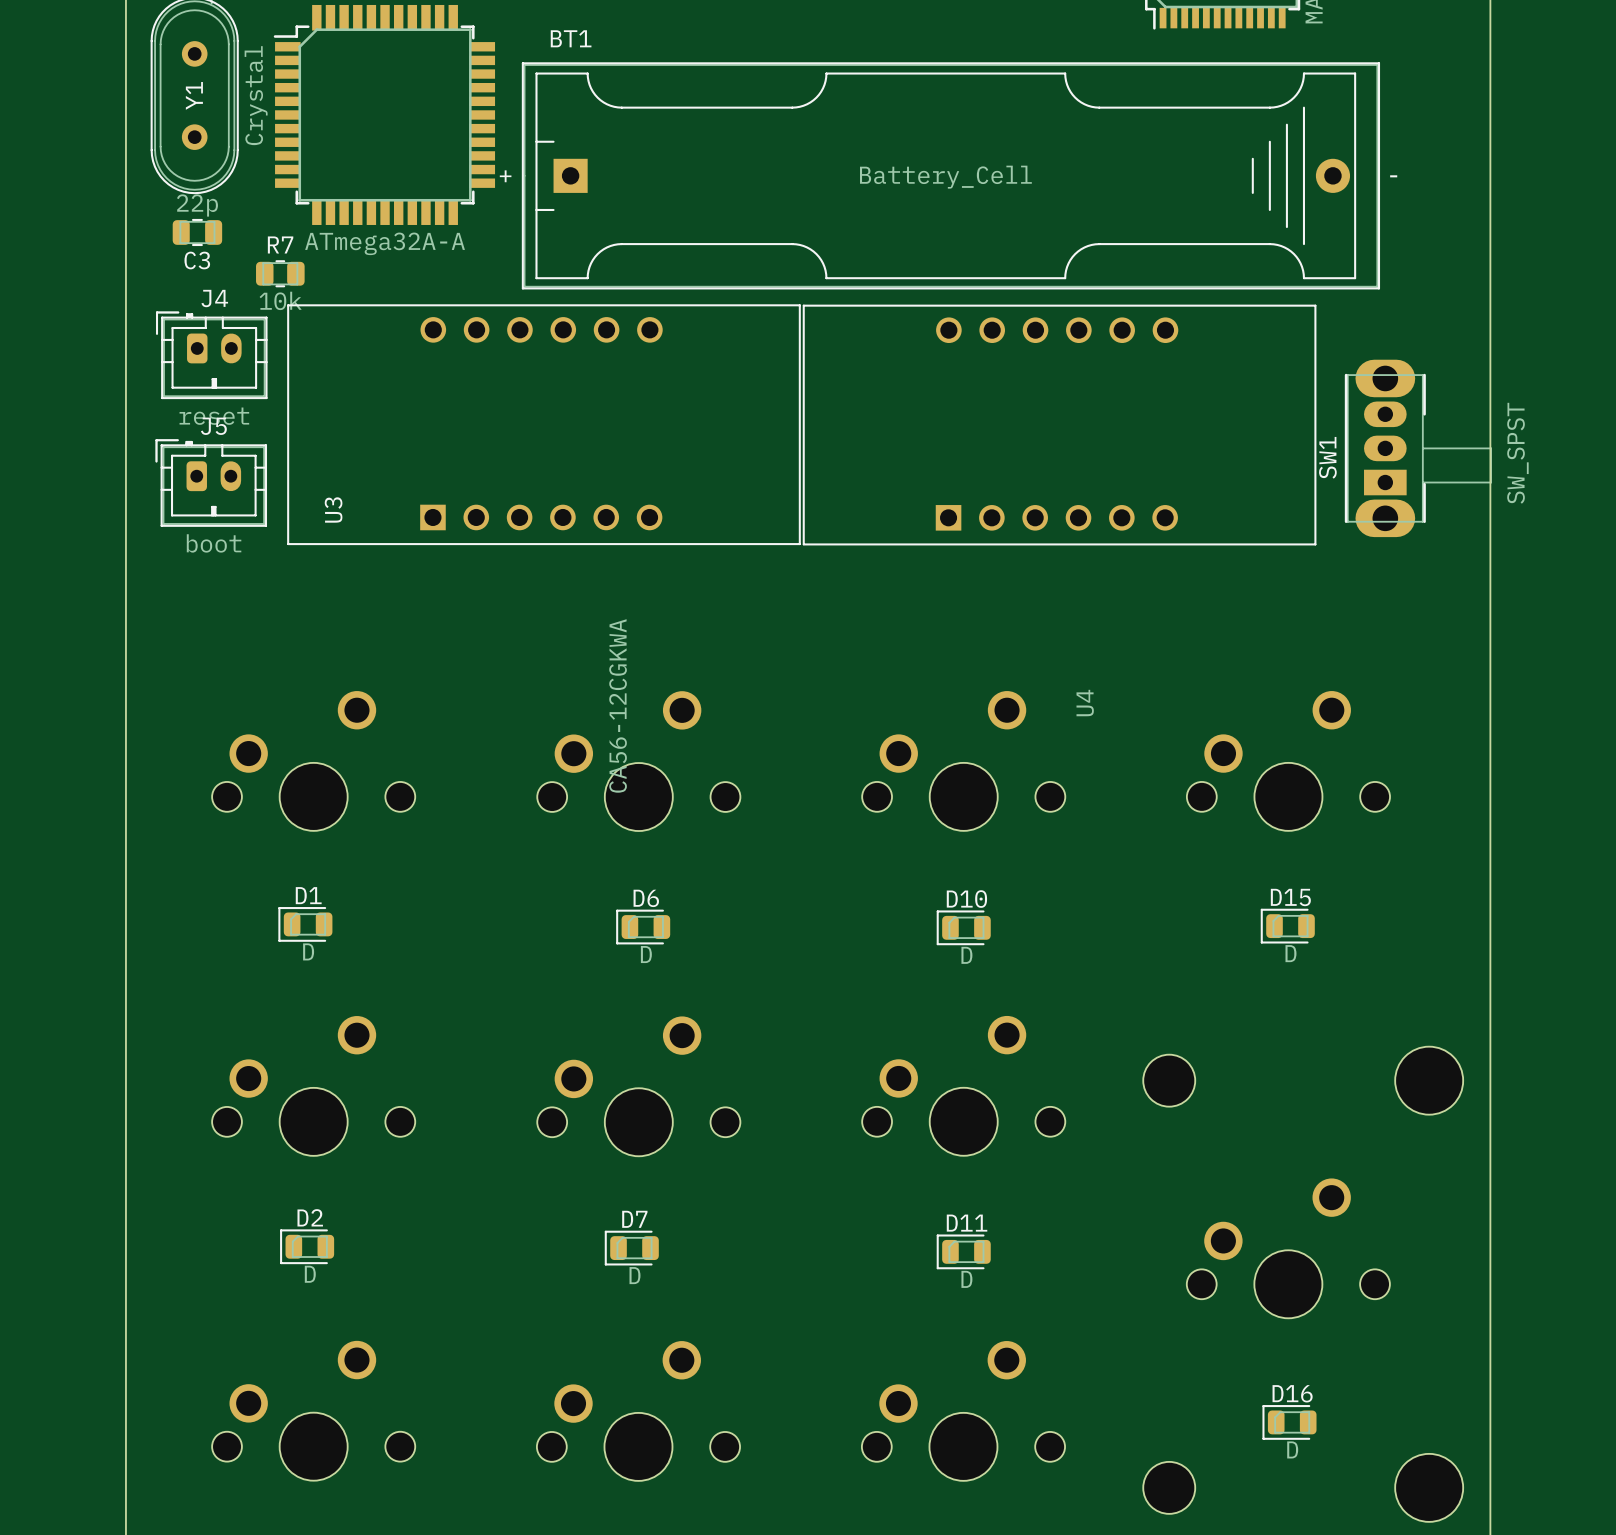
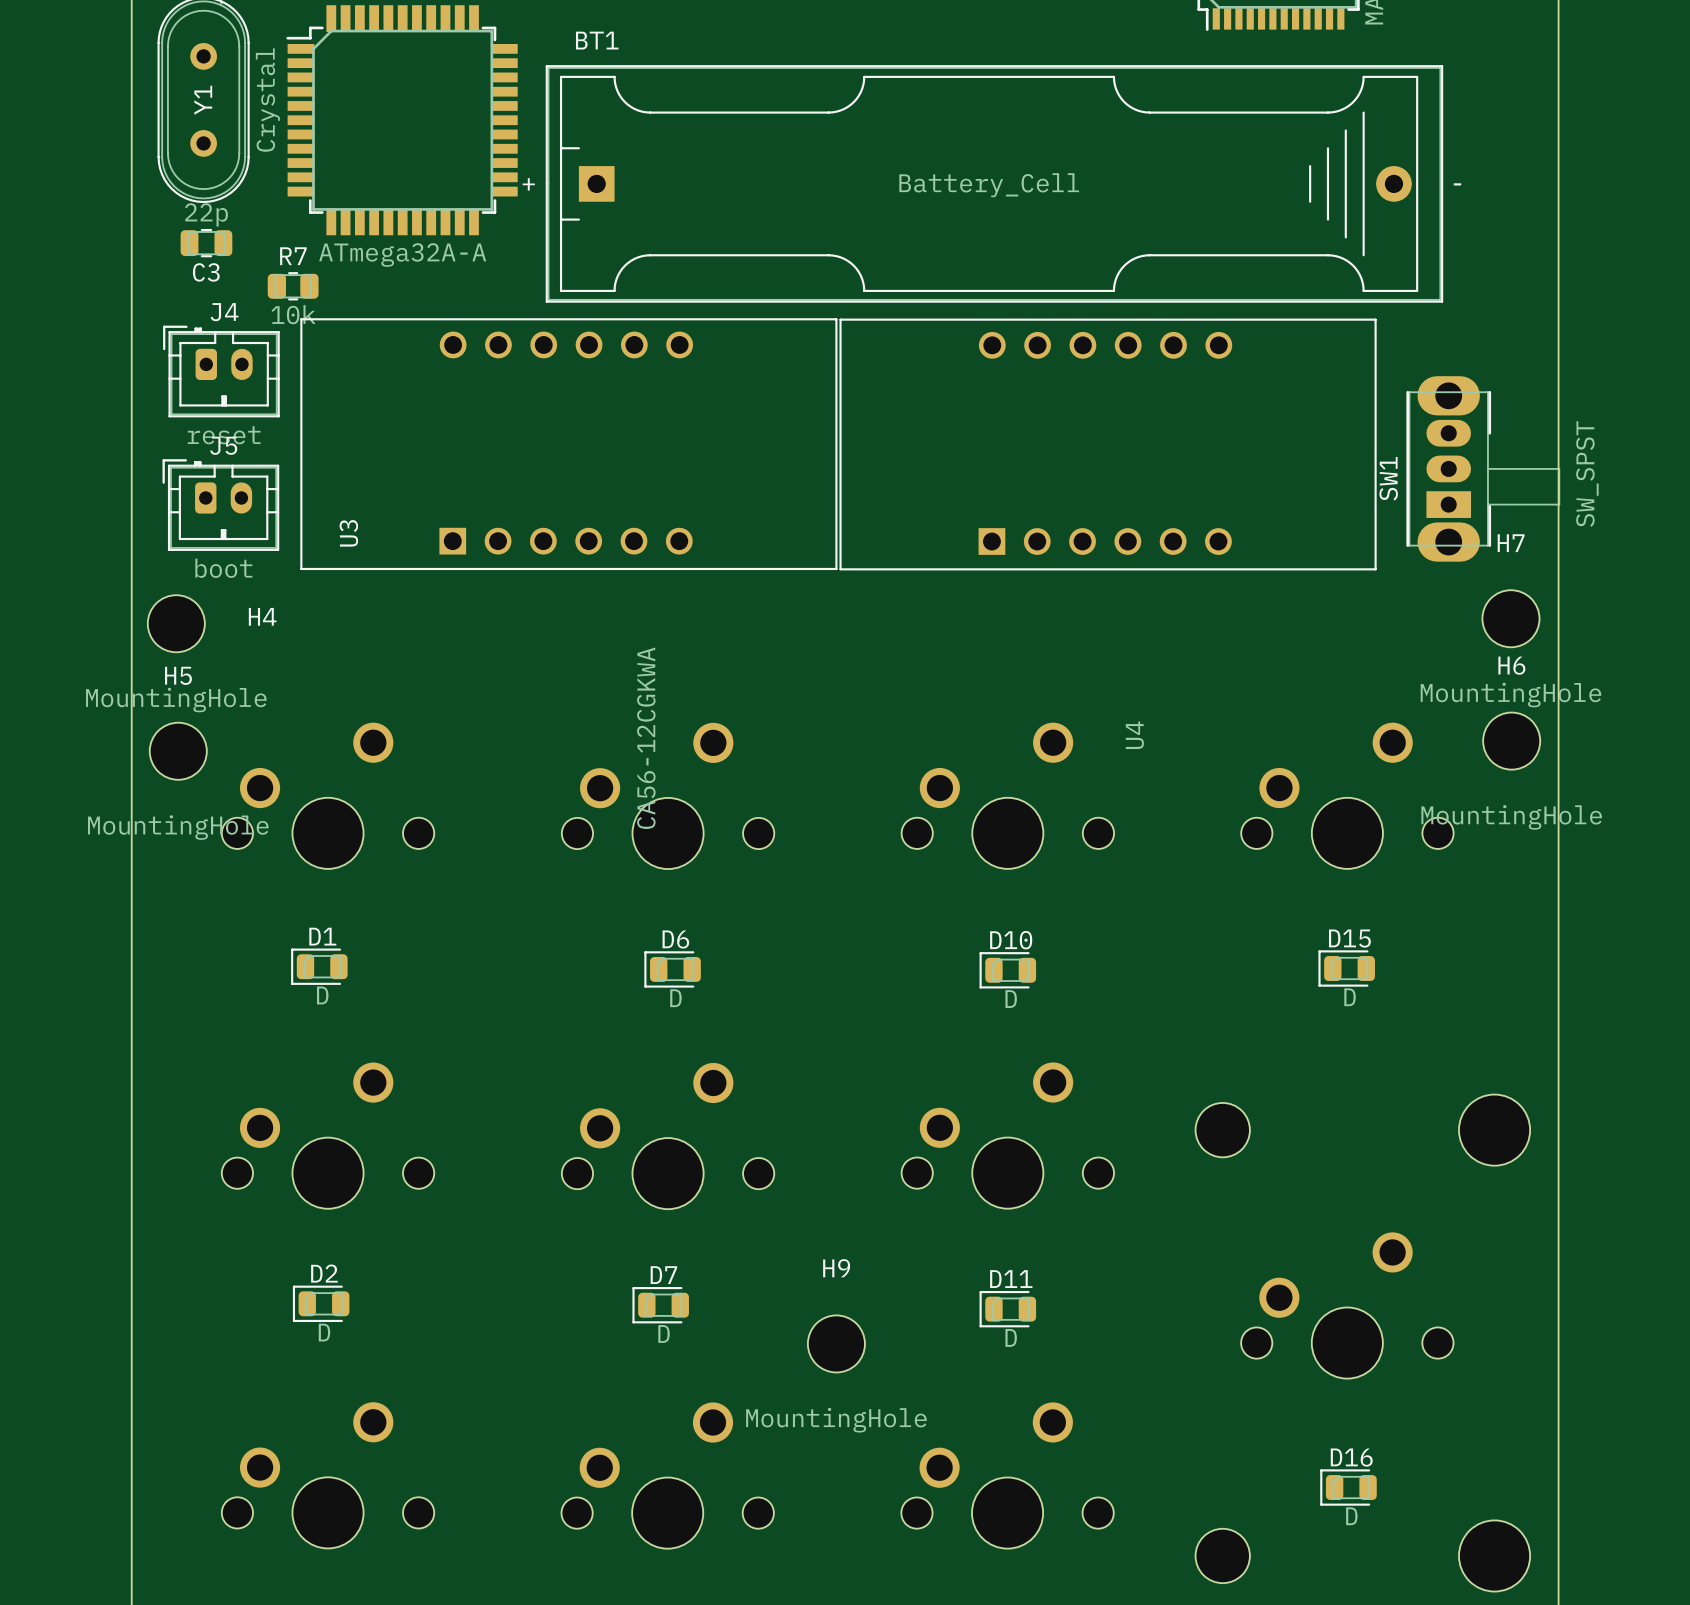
H7: none -> MountingHole (1510, 618)
H4: none -> MountingHole (176, 623)
H6: none -> MountingHole (1511, 741)
H5: none -> MountingHole (178, 751)
H9: none -> MountingHole (836, 1343)

